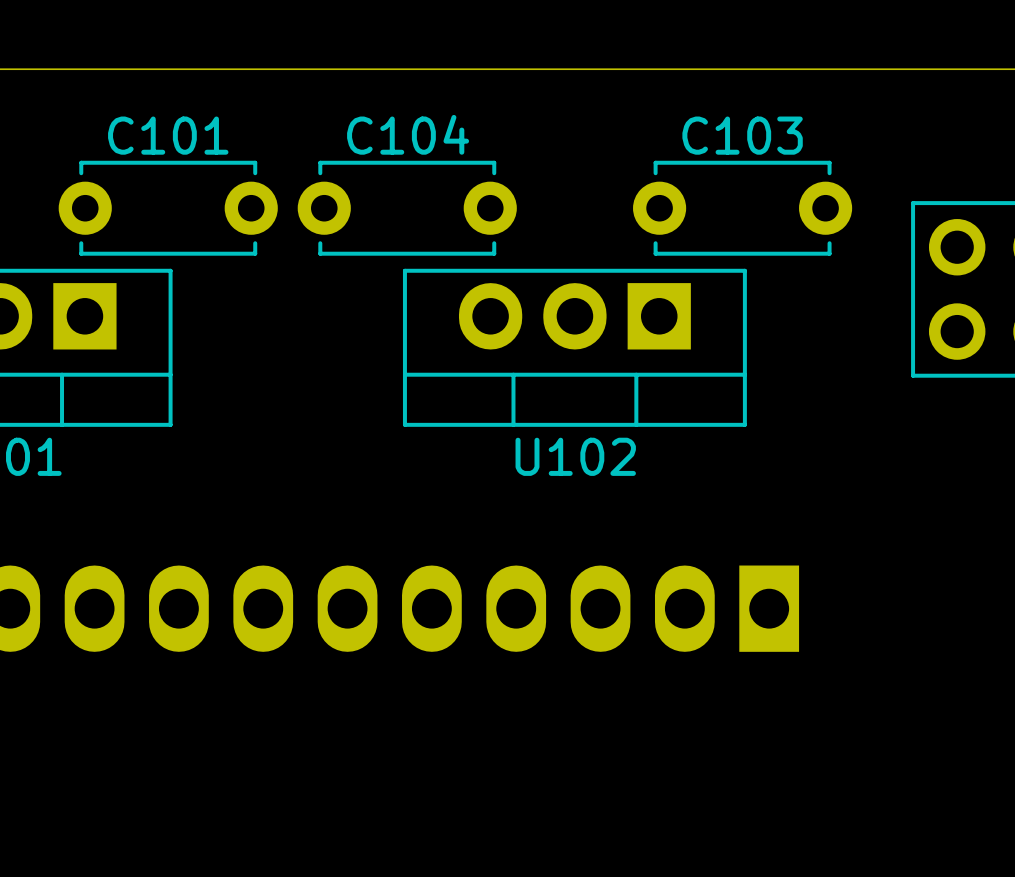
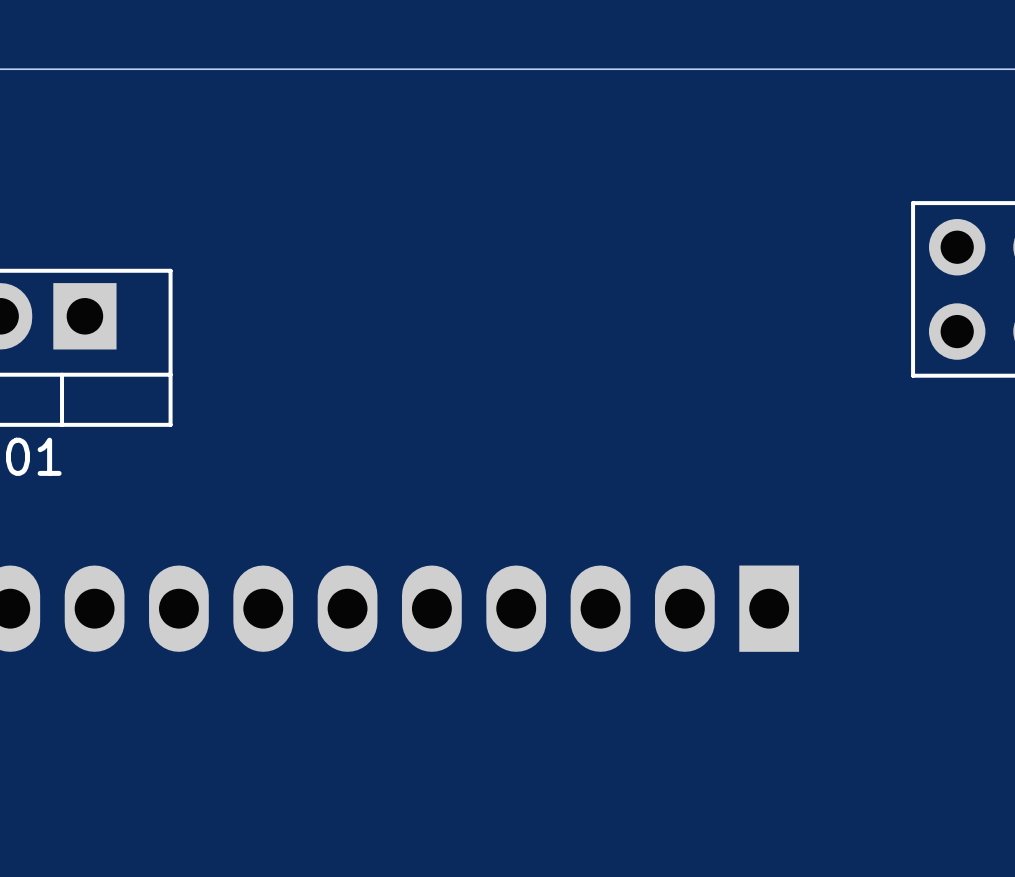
C101: (168, 208) -> none
C104: (407, 208) -> none
C103: (742, 208) -> none
U102: (574, 347) -> none

